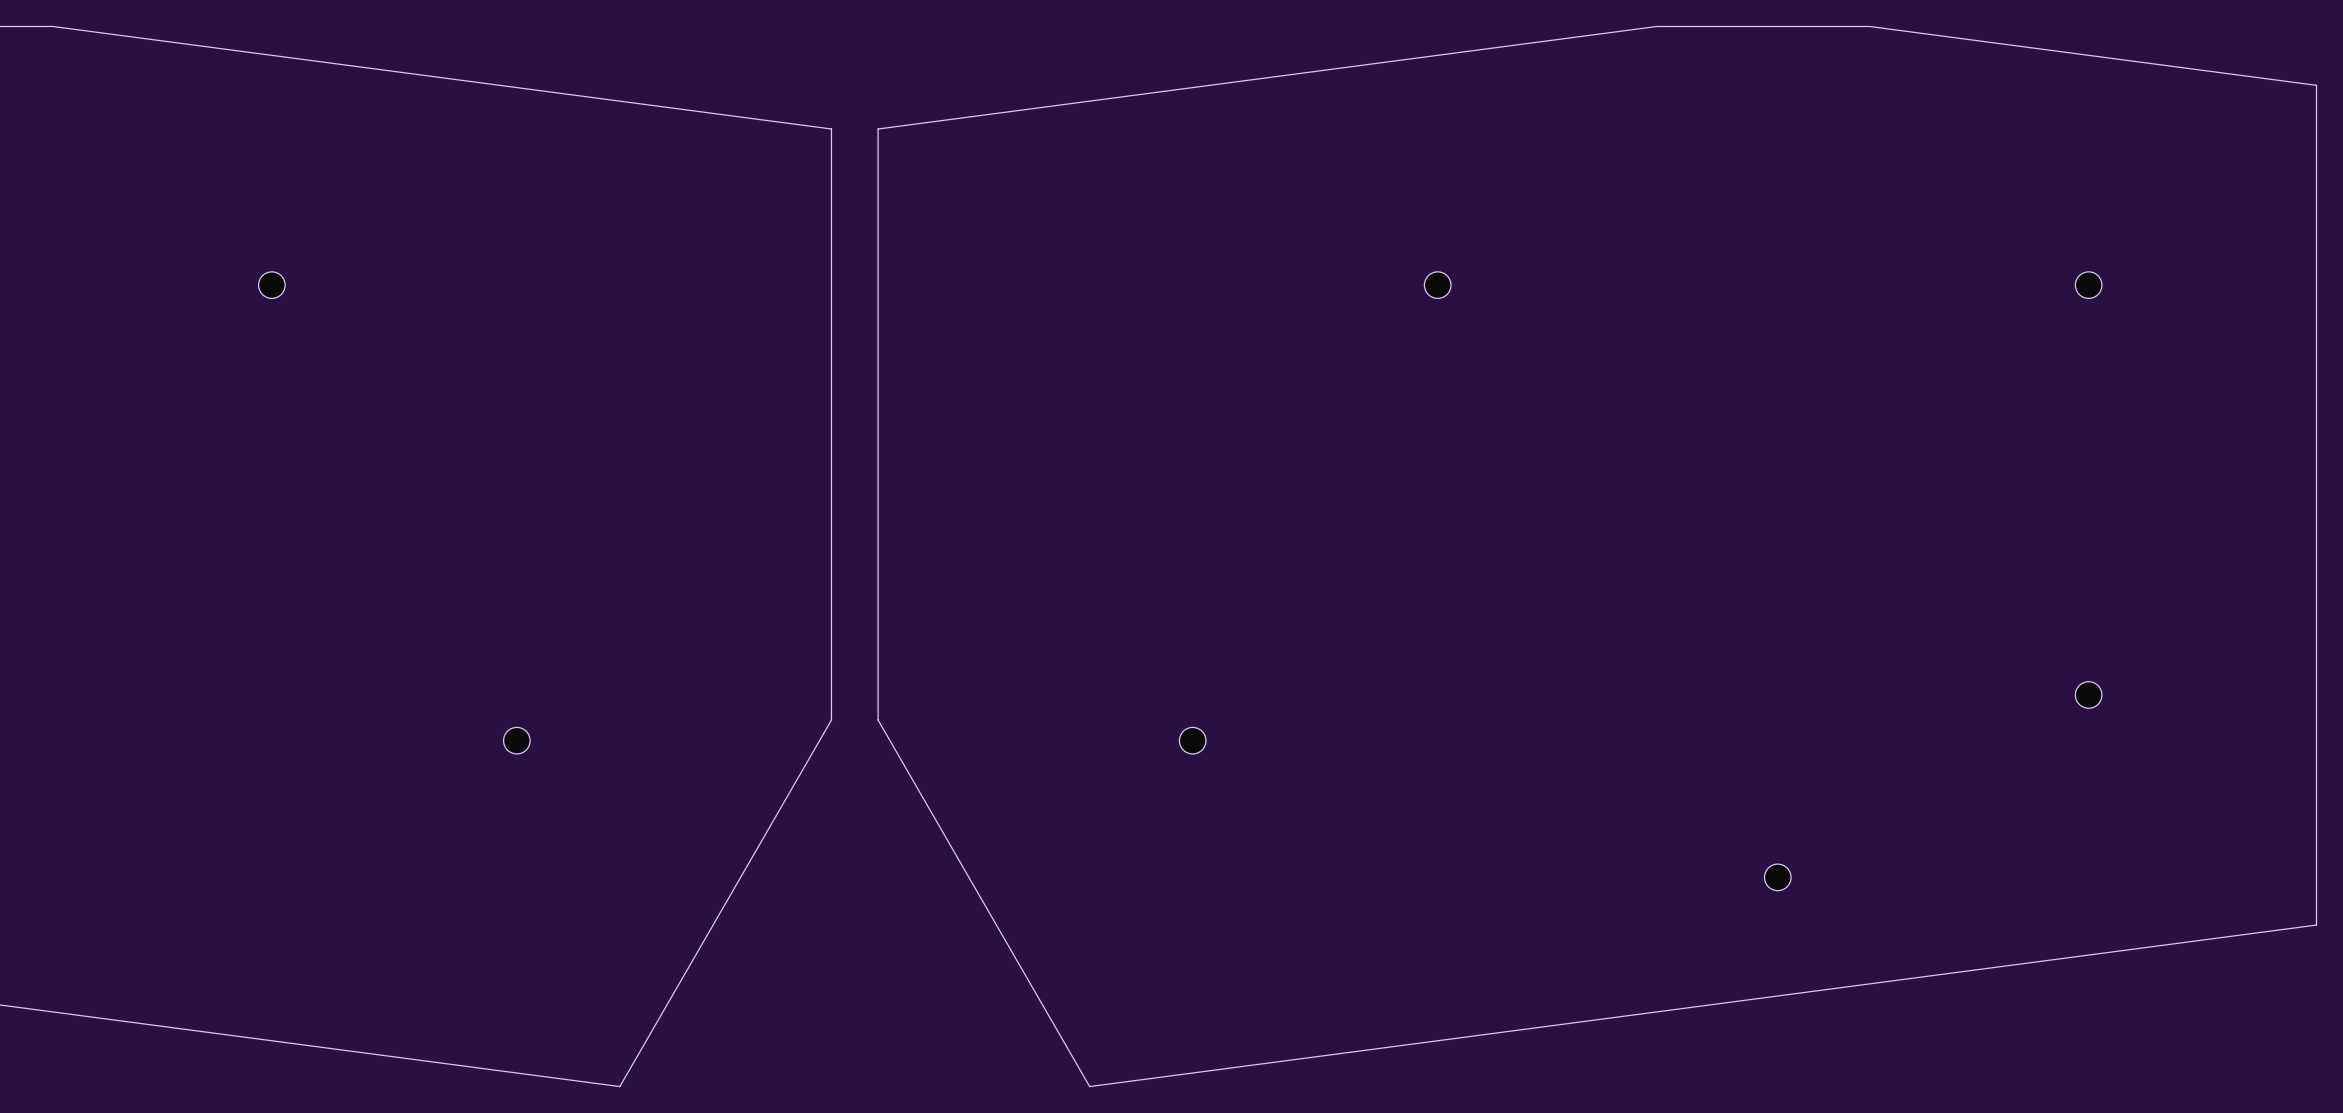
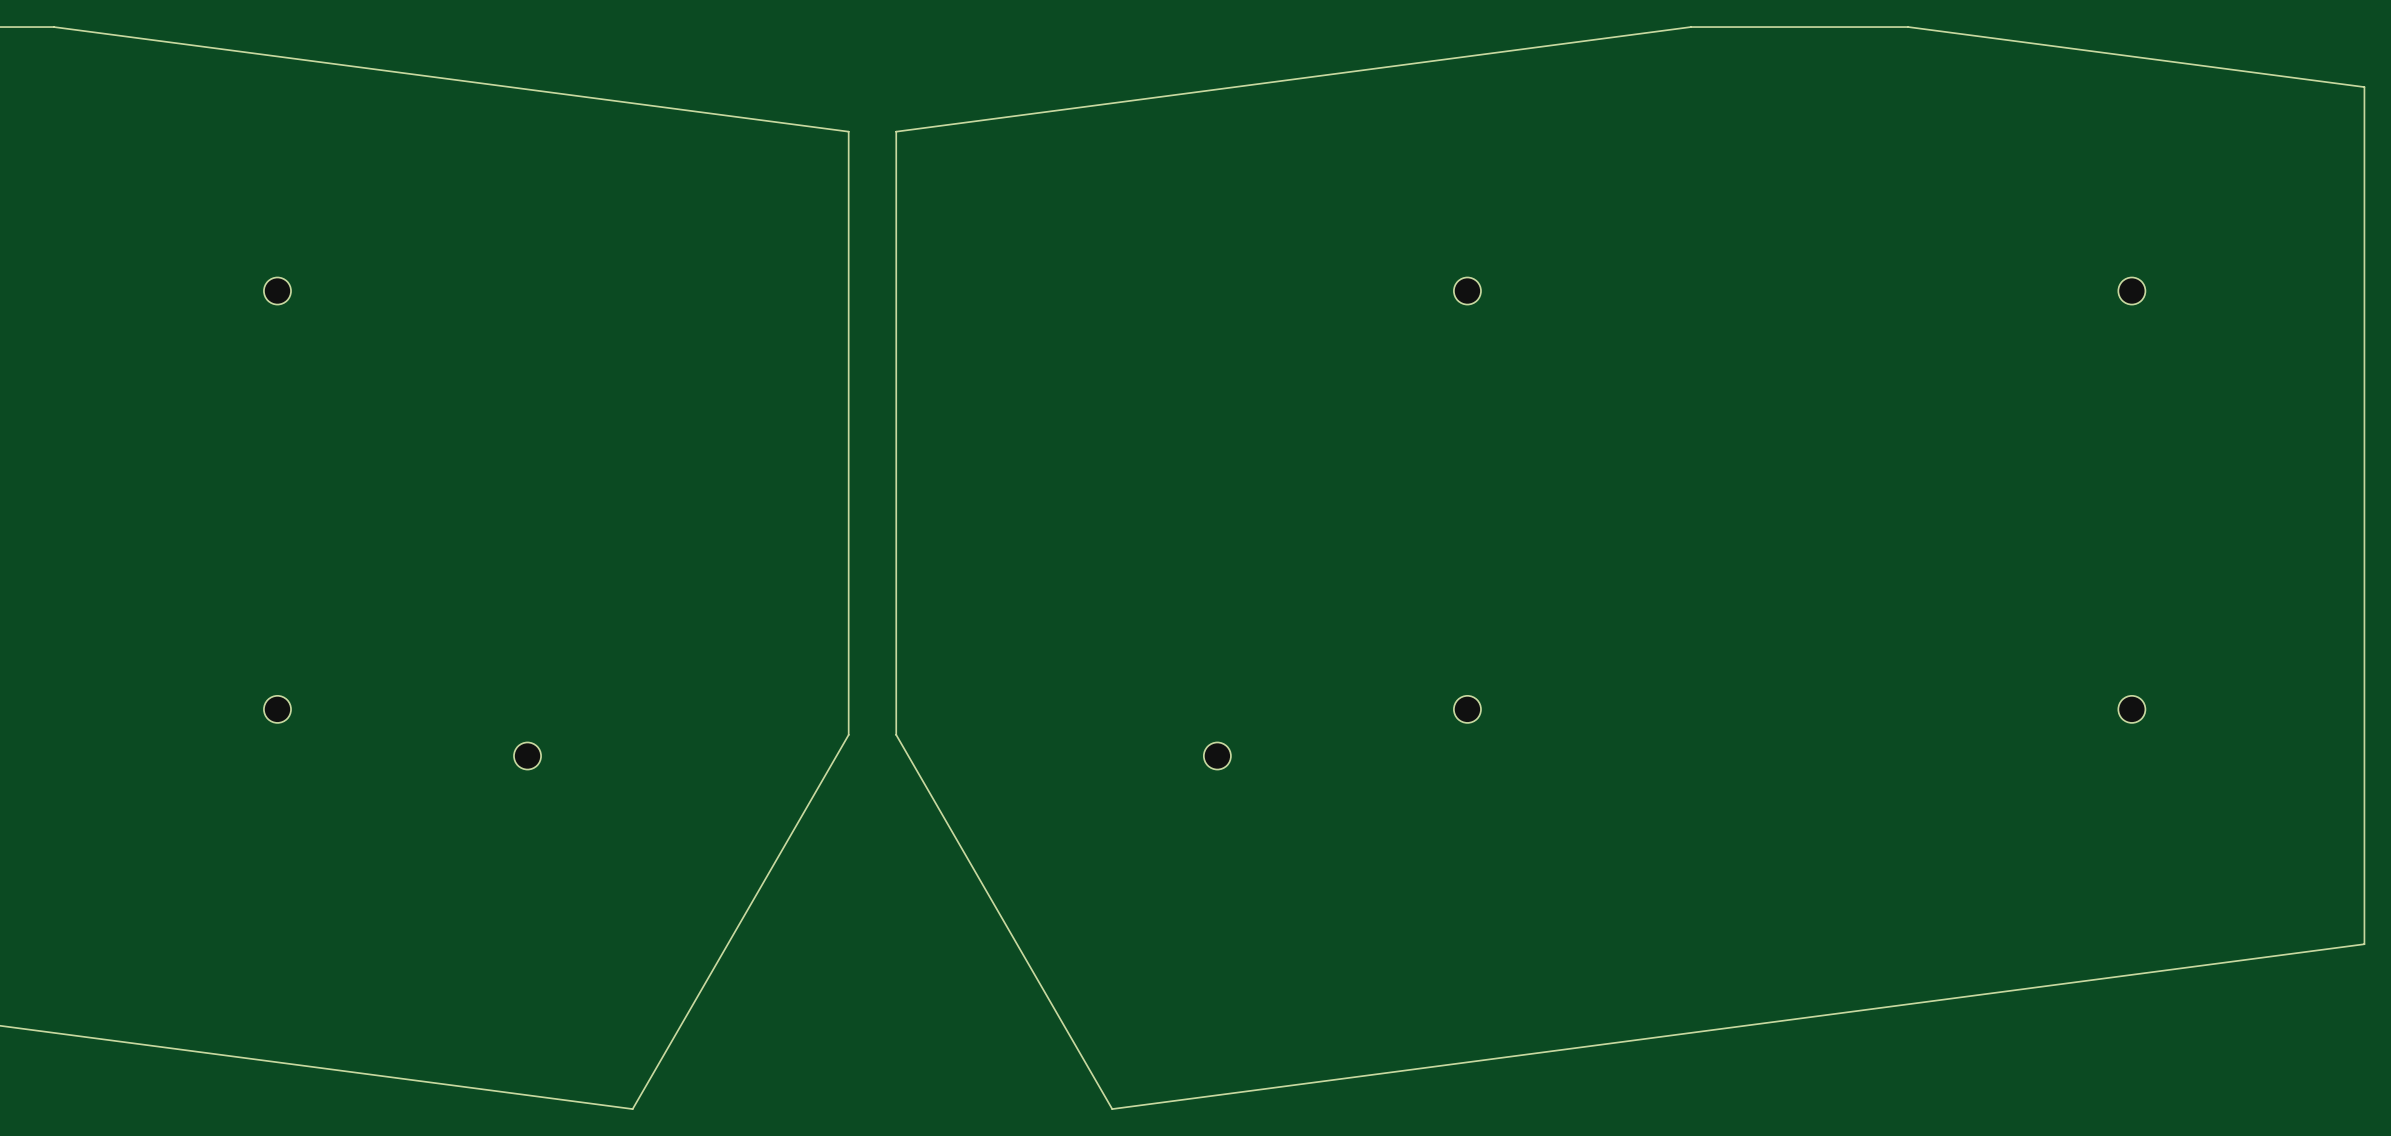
part: none -> (277, 709)
part: none -> (1467, 709)
part: (1777, 877) -> none

